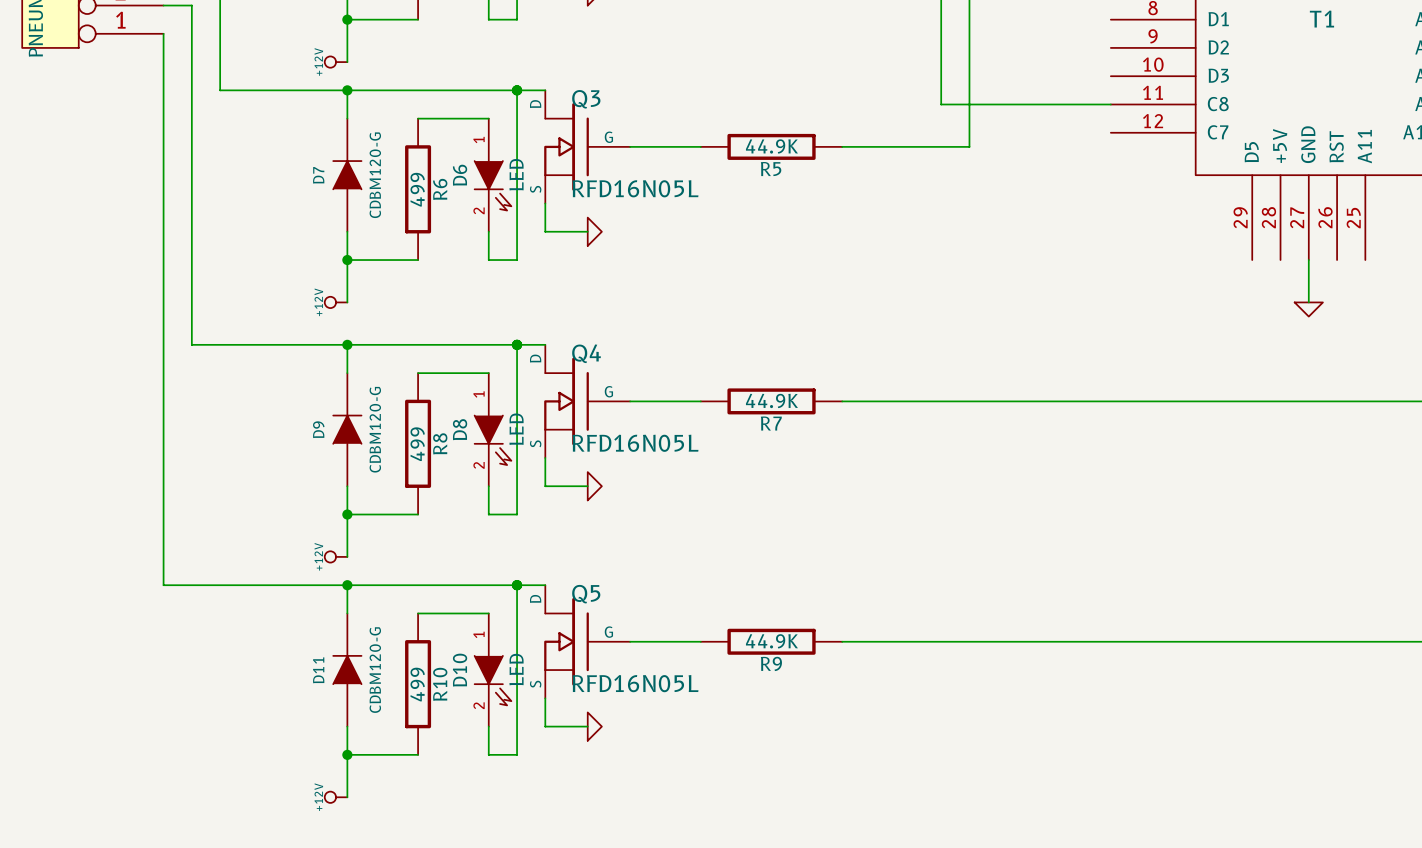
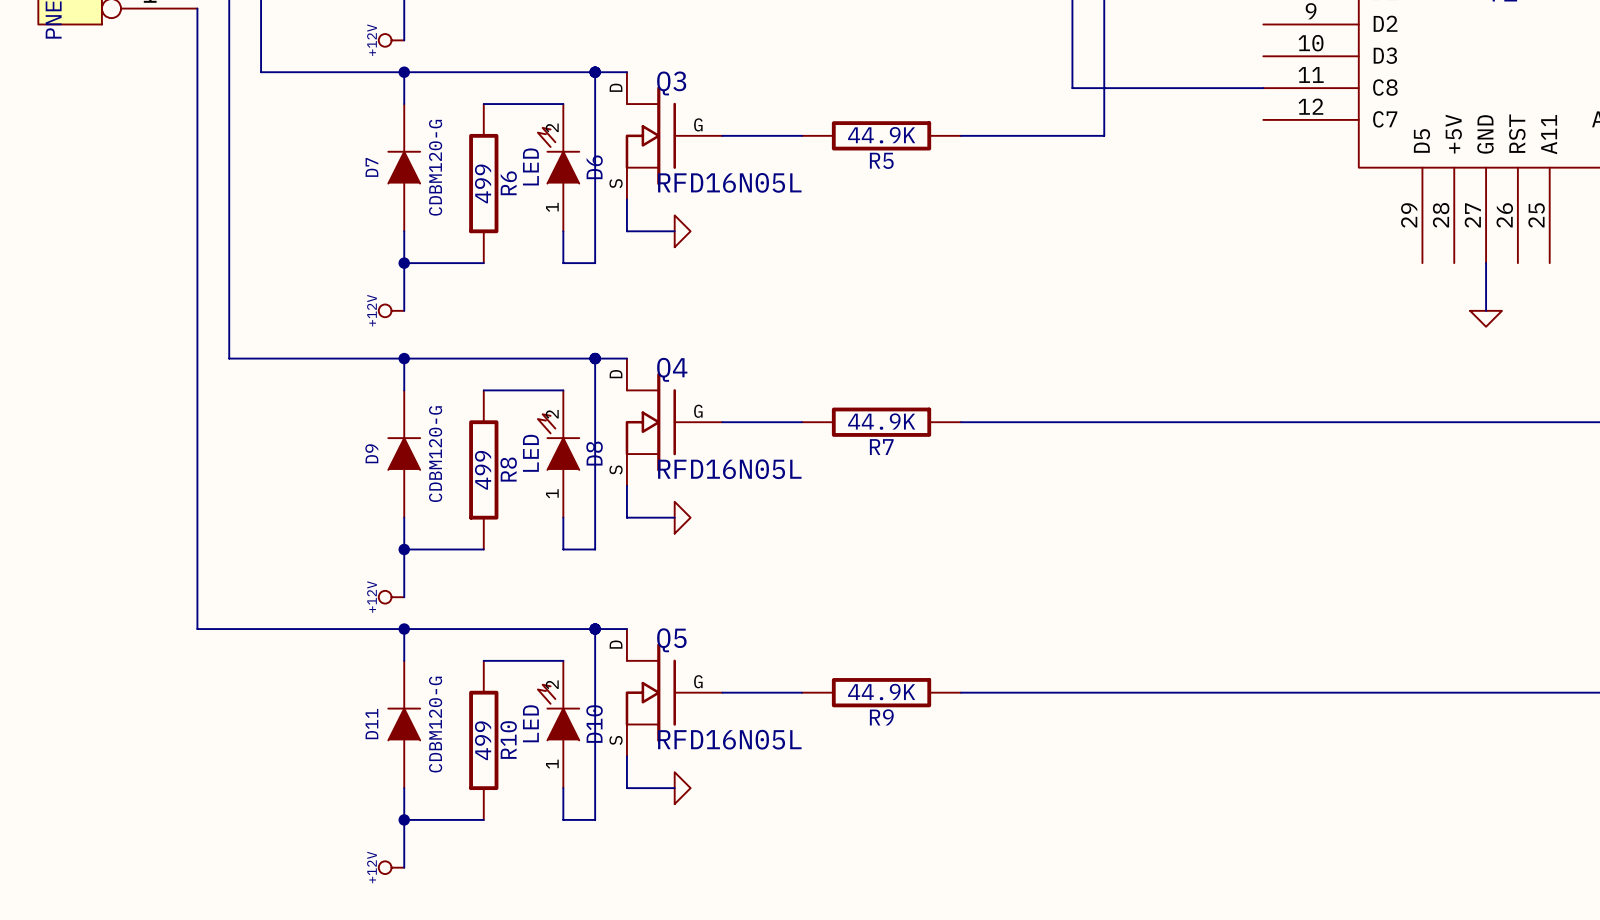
D6 rotation: 0° (493, 185) -> 180° (558, 155)
D8 rotation: 0° (493, 440) -> 180° (558, 442)
D10 rotation: 0° (493, 680) -> 180° (558, 712)

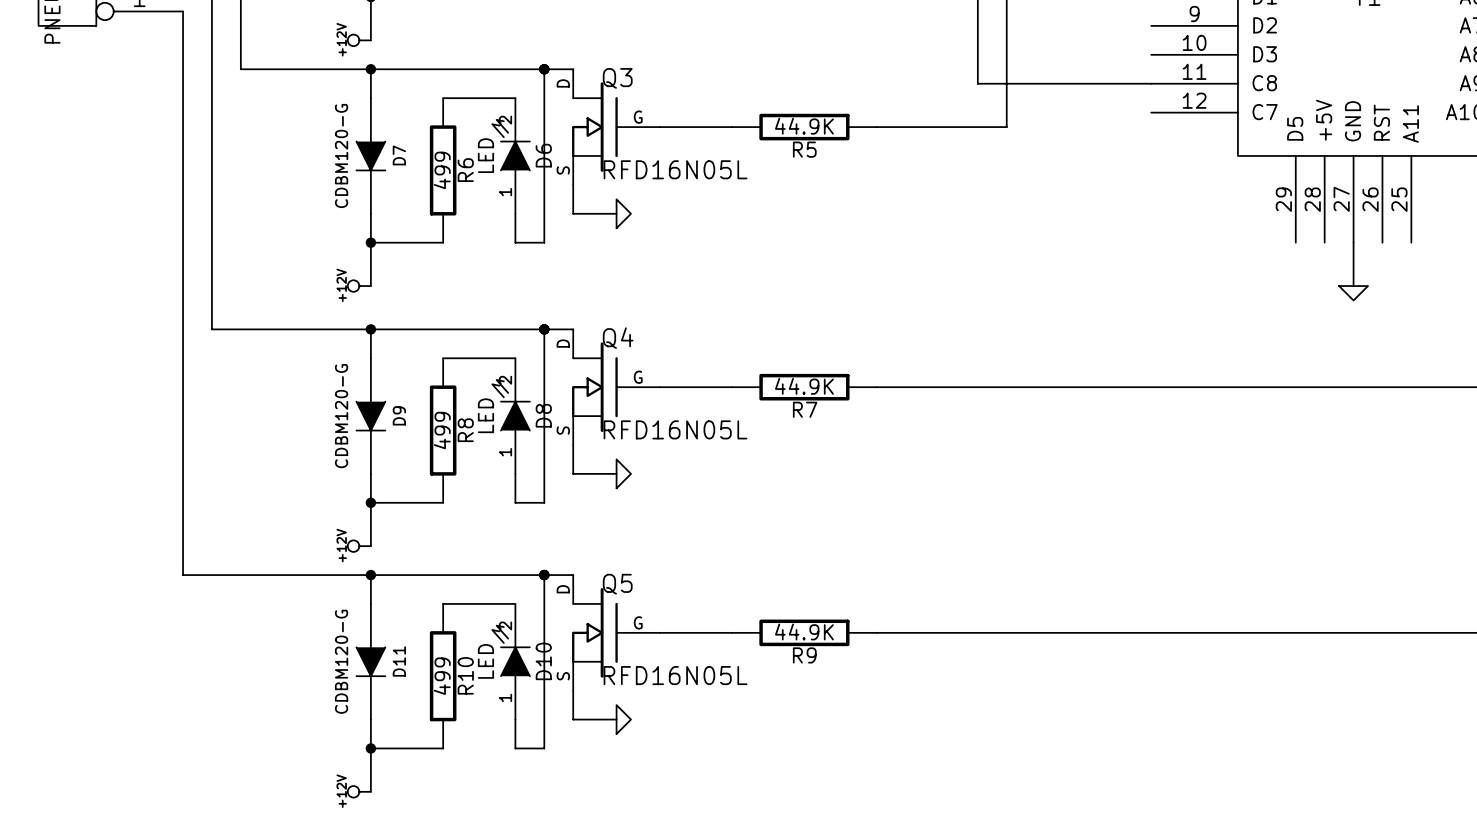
D7 rotation: 0° (404, 167) -> 180° (370, 156)
D9 rotation: 0° (404, 453) -> 180° (370, 416)
D11 rotation: 0° (404, 724) -> 180° (370, 662)

